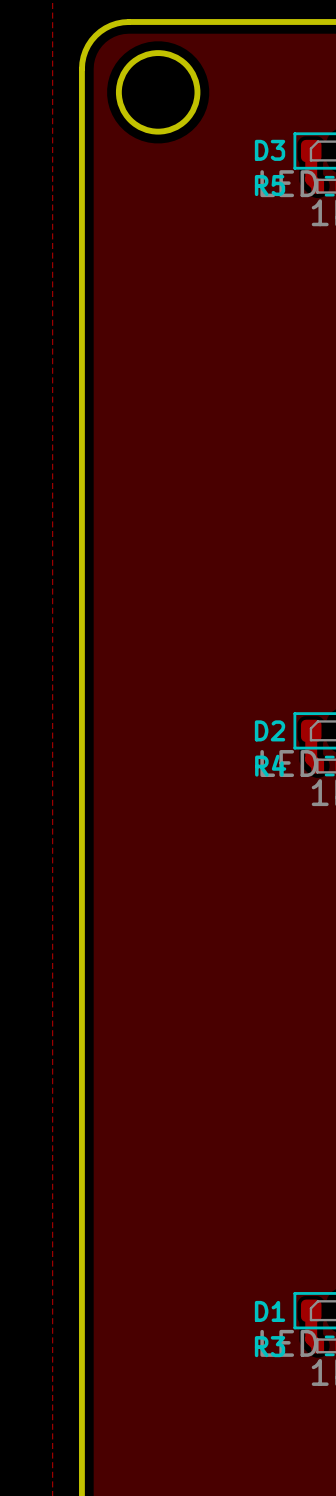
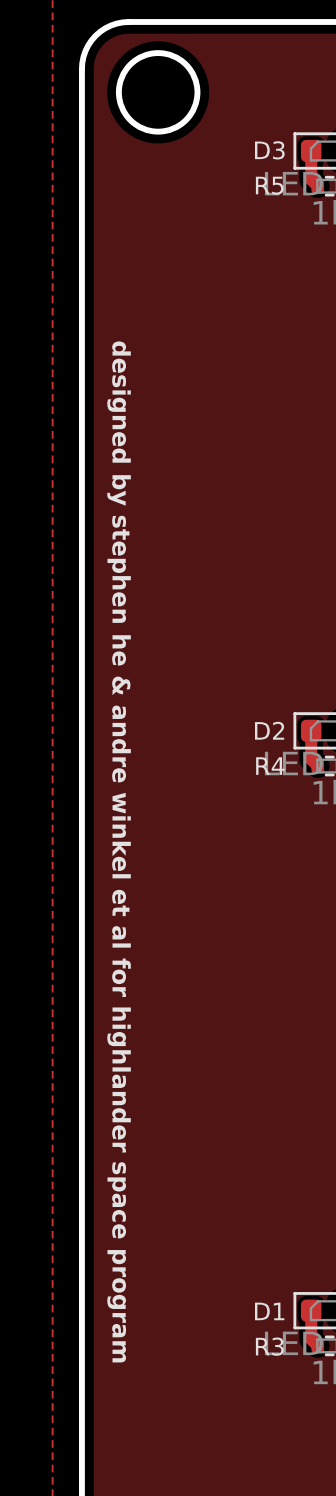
text: none -> designed by stephen he & andre winkel et al for highlander space program (119, 851)

